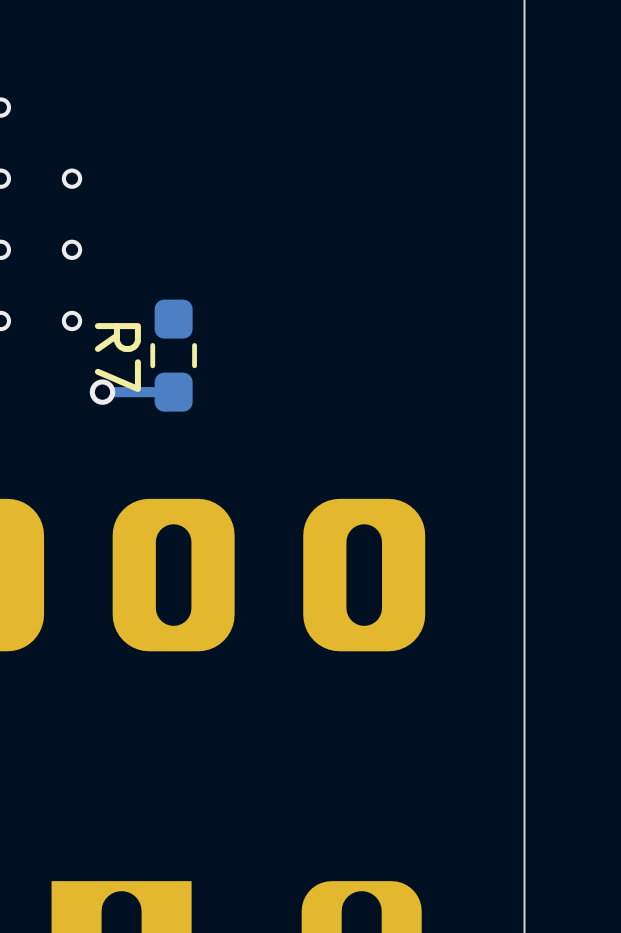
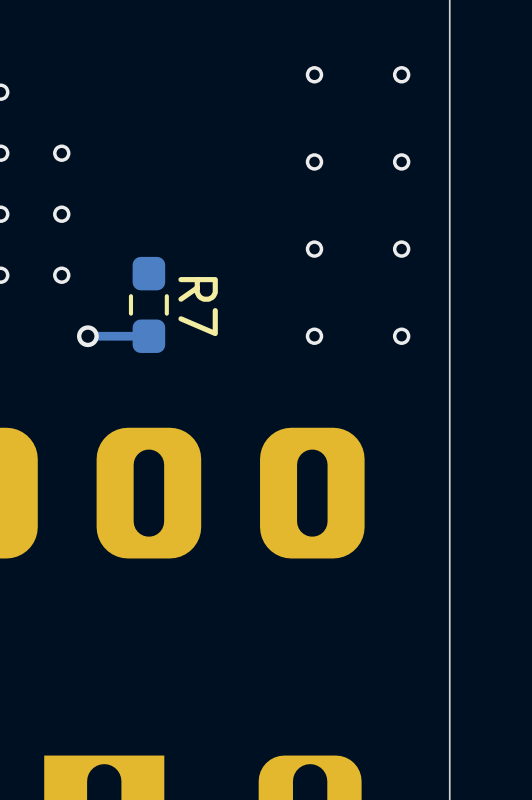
via: none -> (314, 74)
via: none -> (401, 74)
via: none -> (314, 161)
via: none -> (401, 161)
via: none -> (314, 249)
via: none -> (401, 249)
R7 name position: R7 (117, 357) -> R7 (198, 306)
via: none -> (314, 336)
via: none -> (401, 336)

